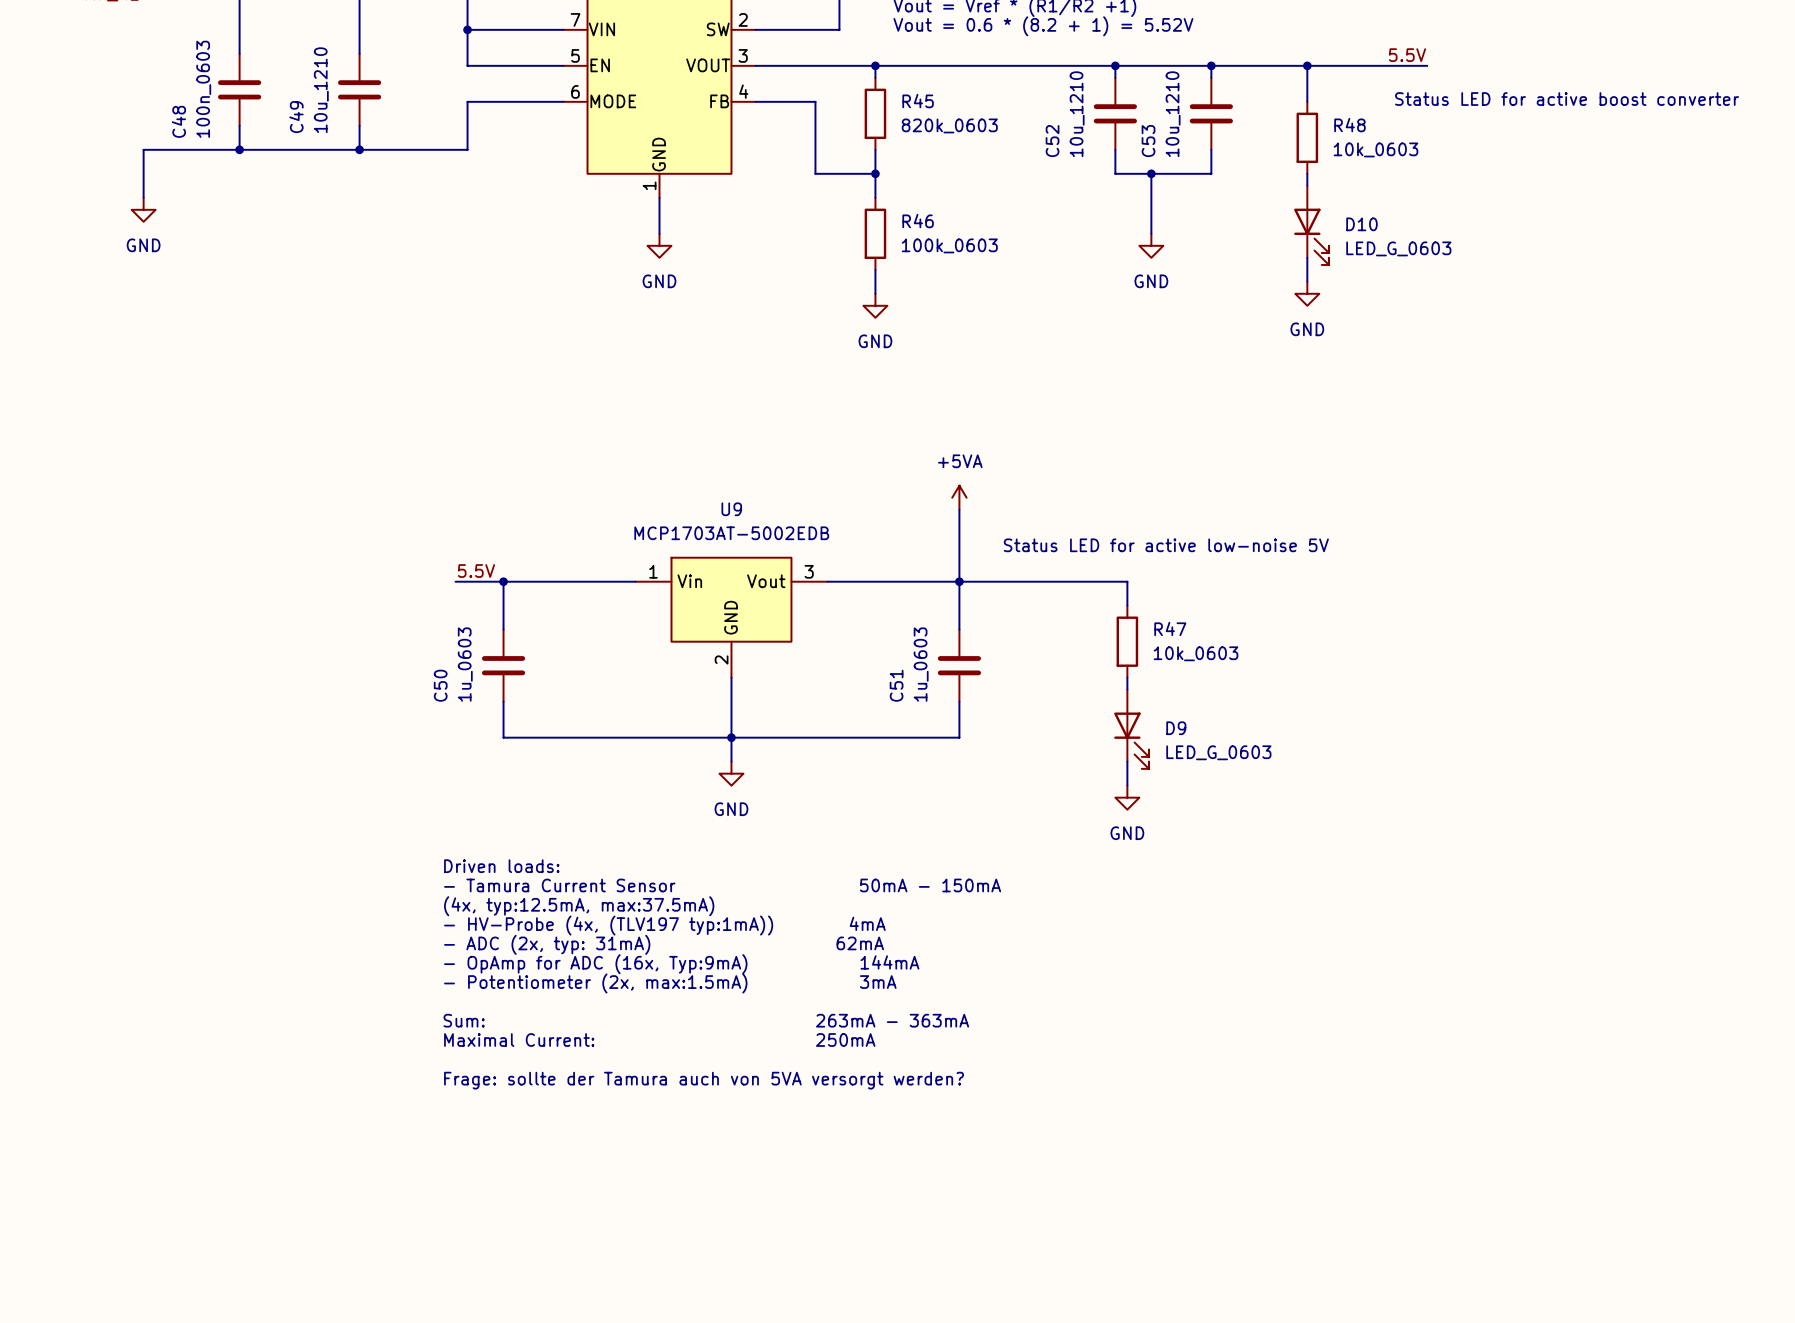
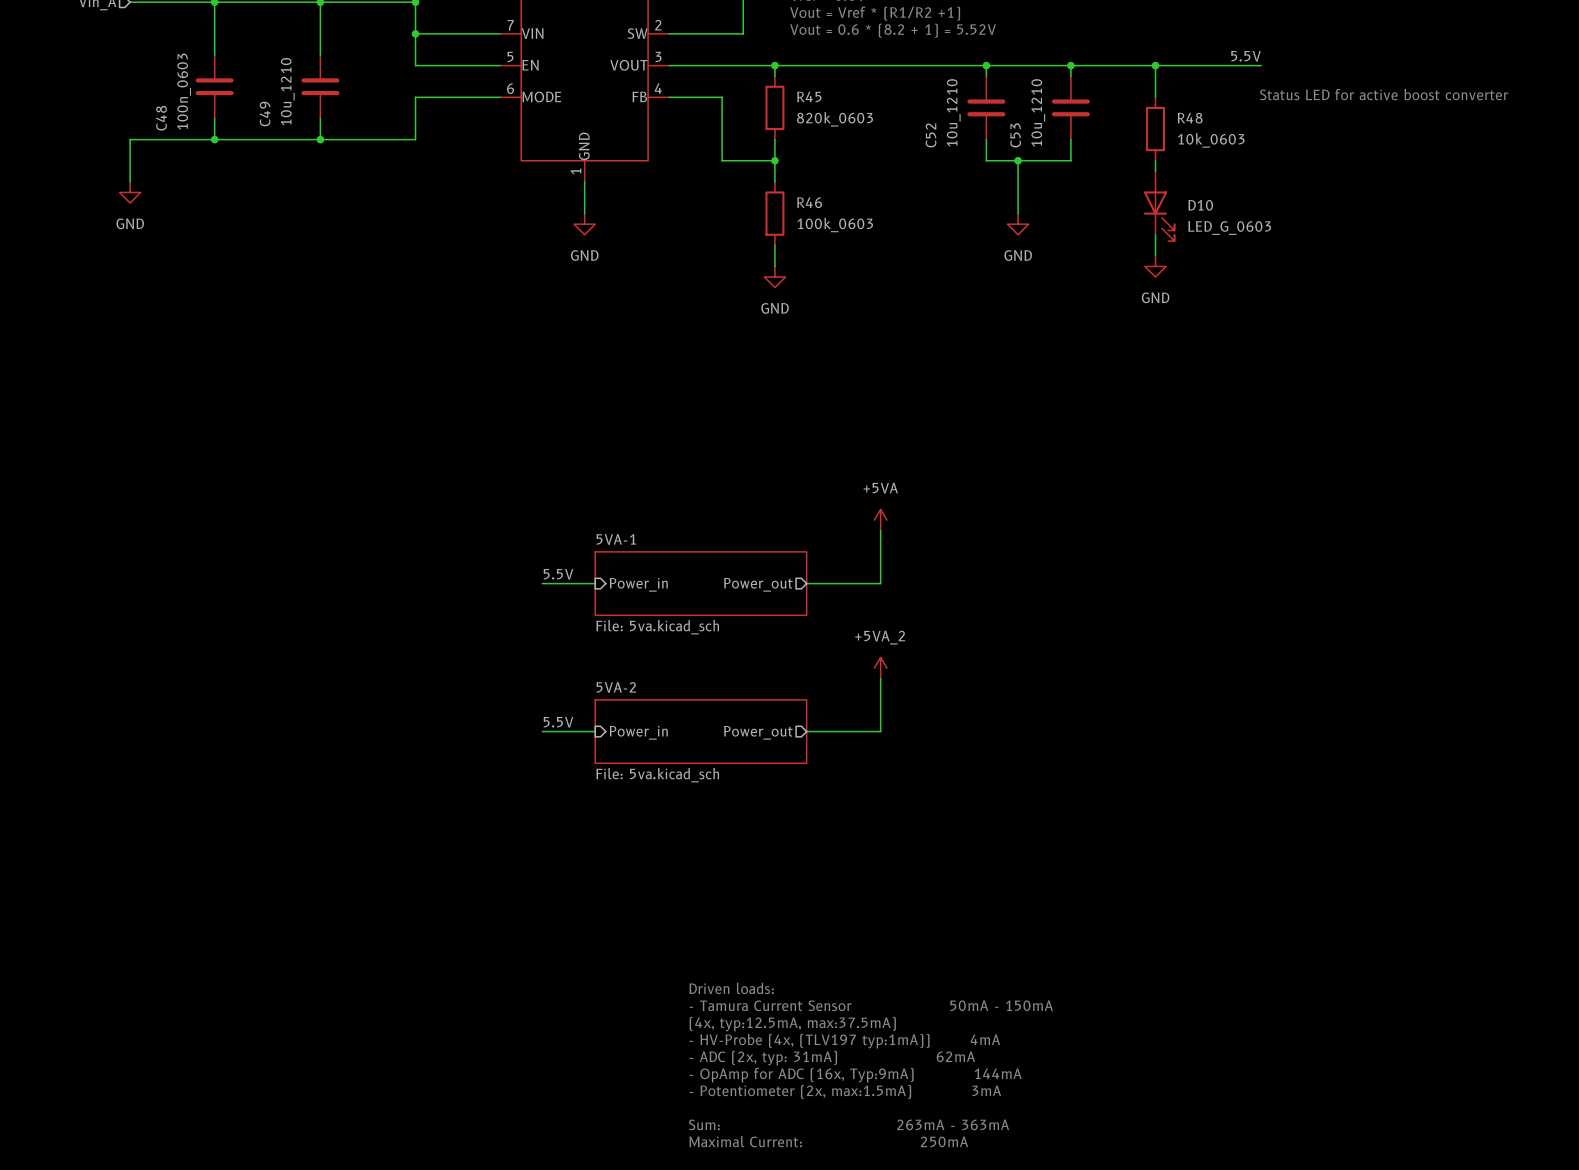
power symbol position: +5VA (959, 497) -> +5VA (880, 520)
wire: (959, 509) (959, 629) -> none
text: Status LED for active low-noise 5V (1166, 545) -> none
label: 5.5V (476, 571) -> none
wire: (455, 581) (635, 581) -> none
wire: (503, 581) (503, 629) -> none
junction: (503, 581) -> none
wire: (827, 581) (1127, 581) (1127, 605) -> none
junction: (959, 581) -> none
wire: none -> (880, 530) (880, 583) (806, 583)
U9: MCP1703AT-5002EDB (731, 617) -> none
R47: 10k_0603 (1127, 641) -> none
label: none -> 5.5V (558, 574)
wire: none -> (542, 583) (595, 583)
sheet pin: none -> Power_in (638, 584)
sheet 5VA-1: none -> File: 5va.kicad_sch (700, 583)
sheet pin: none -> Power_out (758, 584)
C50: 1u_0603 (503, 665) -> none
C51: 1u_0603 (959, 665) -> none
wire: (731, 677) (731, 761) -> none
wire: (1127, 677) (1127, 689) -> none
wire: (503, 701) (503, 737) (959, 737) (959, 701) -> none
D9: LED_G_0603 (1131, 729) -> none
junction: (731, 737) -> none
power symbol: none -> +5VA_2 (880, 668)
wire: none -> (880, 678) (880, 731) (806, 731)
wire: (1127, 761) (1127, 785) -> none
power symbol: GND (731, 773) -> none
power symbol: GND (1127, 797) -> none
label: none -> 5.5V (558, 722)
wire: none -> (542, 731) (595, 731)
sheet pin: none -> Power_in (638, 732)
sheet 5VA-2: none -> File: 5va.kicad_sch (700, 731)
sheet pin: none -> Power_out (758, 732)
text: Driven loads: (501, 866) -> none
text: - Tamura Current Sensor 50mA - 150mA (722, 885) -> none
text: (4x, typ:12.5mA, max:37.5mA) (579, 906) -> none
text: - HV-Probe (4x, (TLV197 typ:1mA)) 4mA (664, 925) -> none
text: - ADC (2x, typ: 31mA) 62mA (664, 944) -> none
text: - OpAmp for ADC (16x, Typ:9mA) 144mA (681, 964) -> none
text: - Potentiometer (2x, max:1.5mA) 3mA (670, 983) -> none
text: Sum: 263mA - 363mA (706, 1020) -> none
text: Maximal Current: 250mA (659, 1040) -> none
text: Frage: sollte der Tamura auch von 5VA versorgt werden? (704, 1080) -> none
text: none -> Driven loads: (731, 988)
text: none -> - Tamura Current Sensor 50mA - 150mA (871, 1005)
text: none -> (4x, typ:12.5mA, max:37.5mA) (792, 1024)
text: none -> - HV-Probe (4x, (TLV197 typ:1mA)) 4mA (844, 1041)
text: none -> - ADC (2x, typ: 31mA) 62mA (832, 1058)
text: none -> - OpAmp for ADC (16x, Typ:9mA) 144mA (855, 1075)
text: none -> - Potentiometer (2x, max:1.5mA) 3mA (845, 1091)
text: none -> Sum: 263mA - 363mA (848, 1124)
text: none -> Maximal Current: 250mA (828, 1141)

